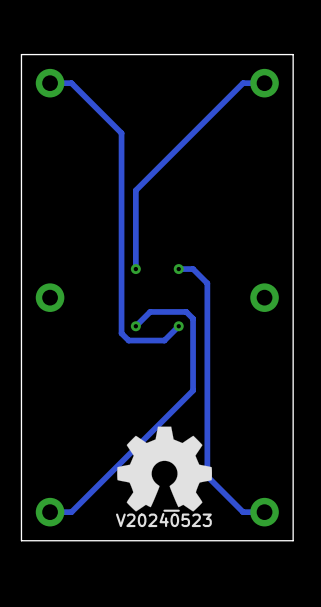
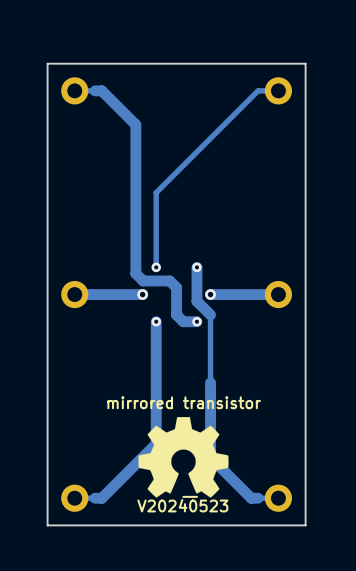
track: (71, 83) (121, 133) (121, 333) (128, 340) (164, 340) (178, 326) -> (95, 90) (101, 90) (135, 124) (135, 273) (143, 280) (169, 280) (176, 287) (176, 314) (183, 321) (196, 321)
track: (178, 269) (193, 269) (207, 283) (207, 476) (243, 512) -> (210, 382) (210, 457) (251, 498) (258, 498)
track: none -> (142, 294) (74, 294)
via: none -> (142, 294)
via: none -> (210, 294)
track: none -> (278, 294) (210, 294)
track: (193, 319) (186, 311) (150, 311) (135, 326) -> (210, 314) (196, 301) (196, 267)
track: (193, 390) (71, 512) -> (156, 321) (156, 443) (101, 498) (95, 498)
text: none -> mirrored transistor (184, 402)

